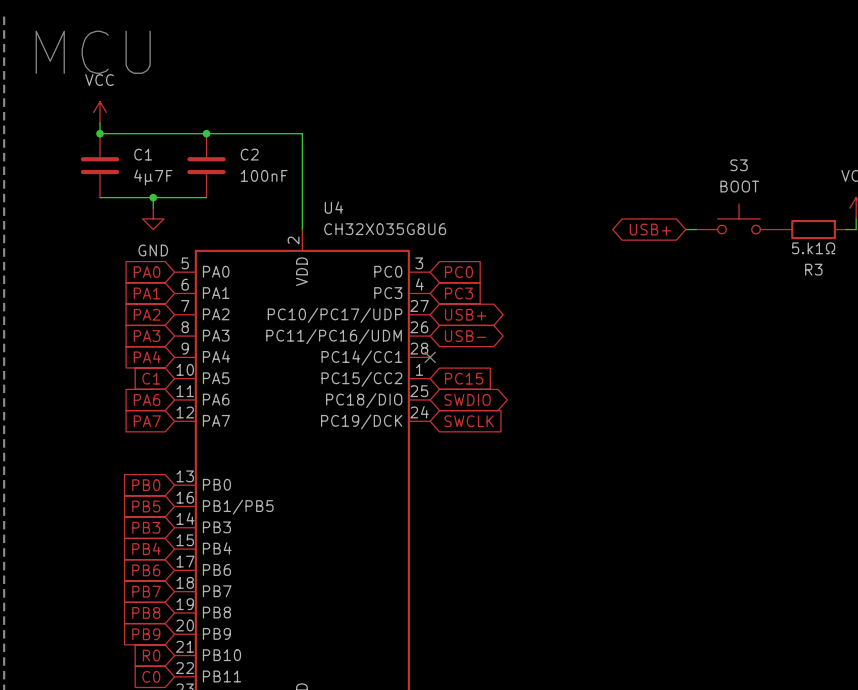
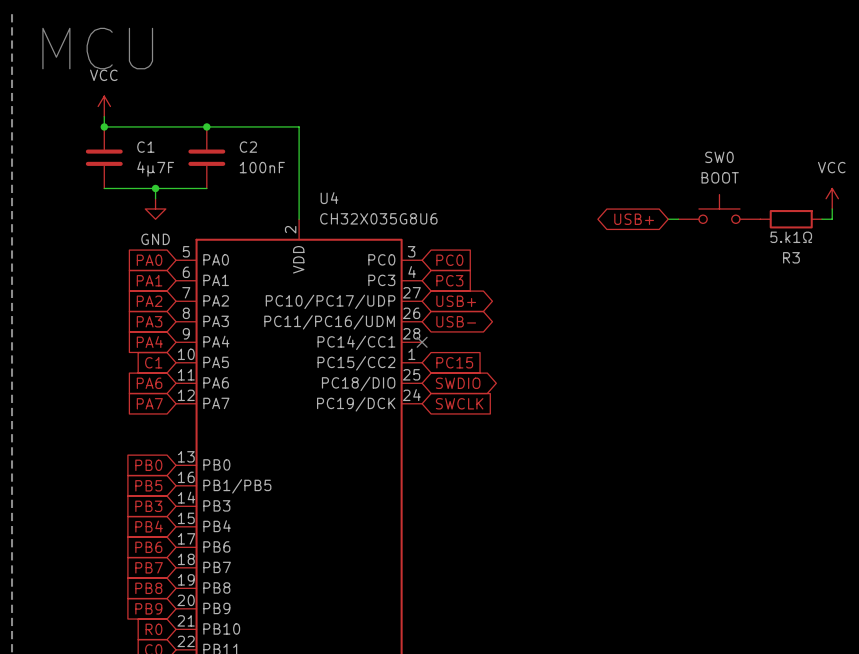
S3 name: S3 (739, 165) -> SW0 (719, 157)

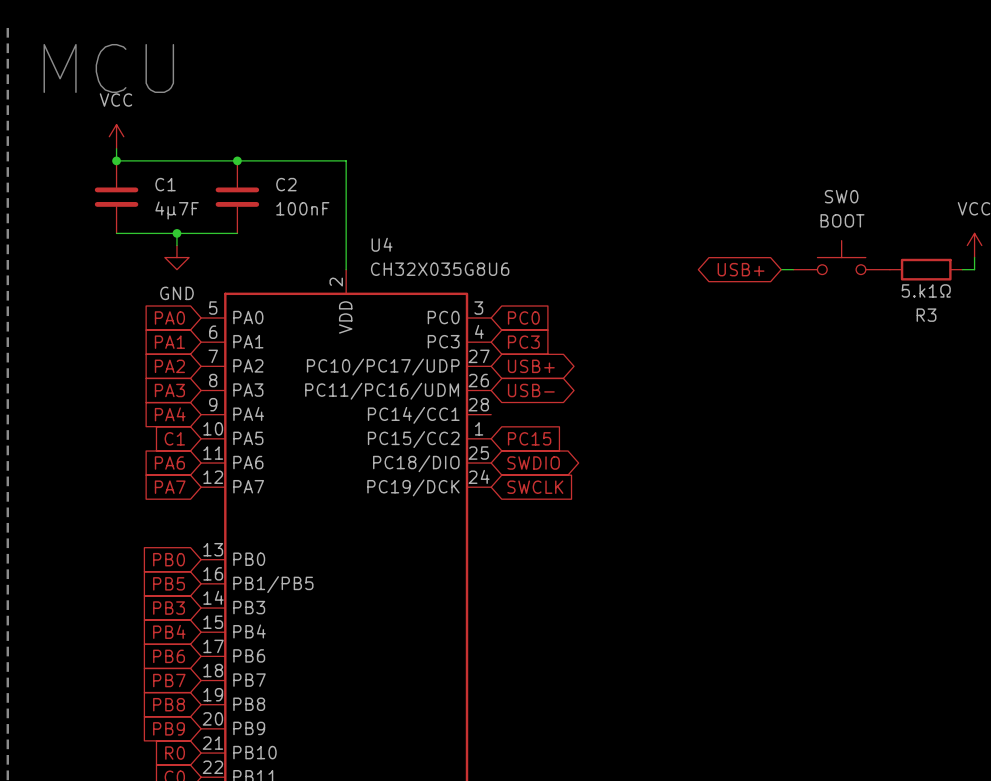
no-connect mark: (422, 342) -> none

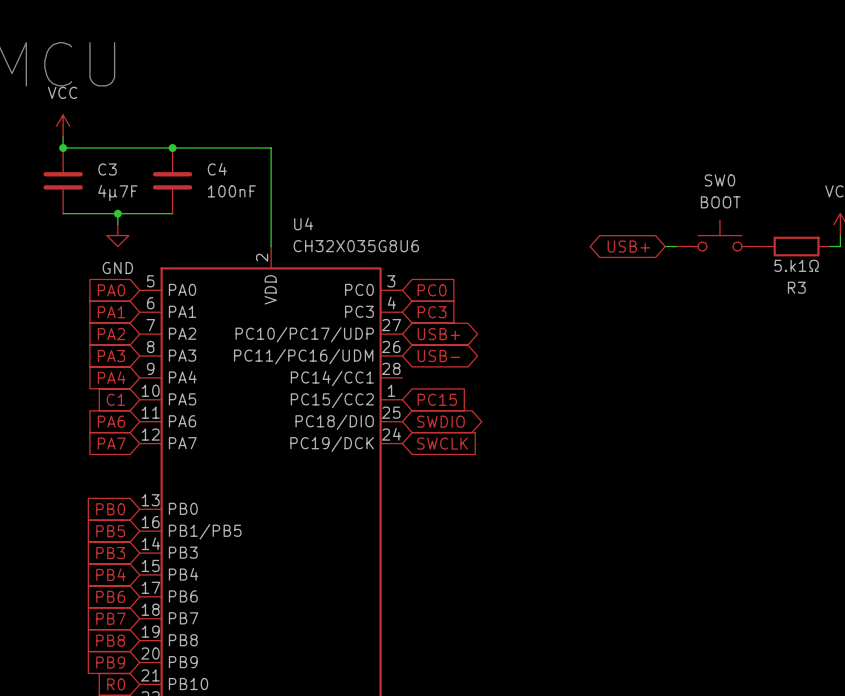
C1 name: C1 (165, 184) -> C3 (107, 169)
C2 name: C2 (286, 184) -> C4 (217, 169)

